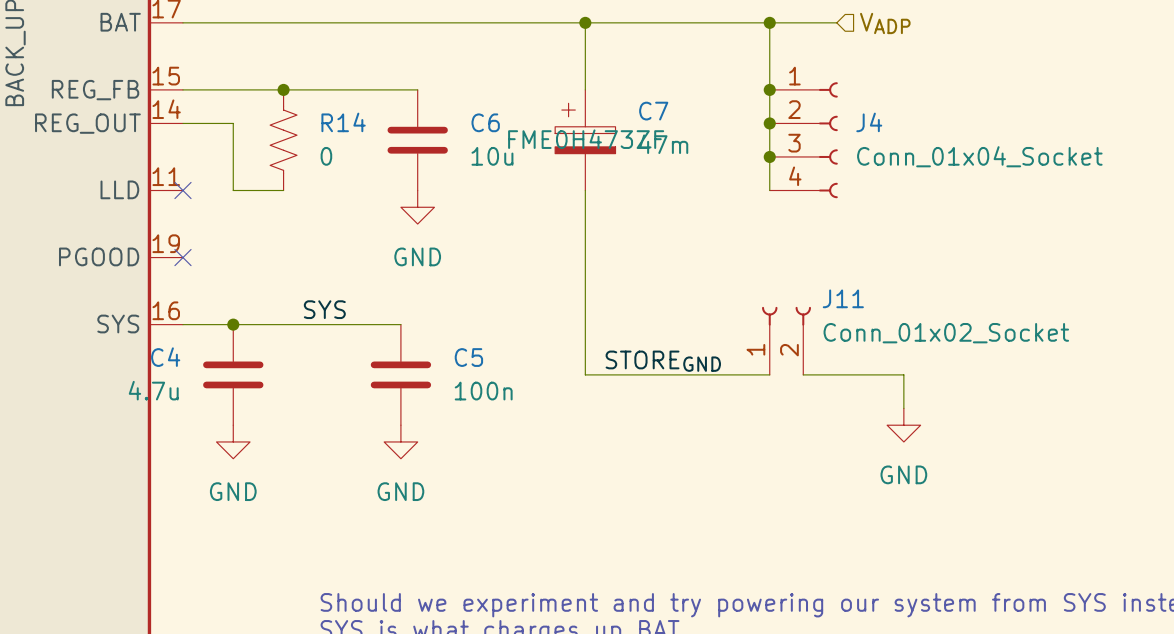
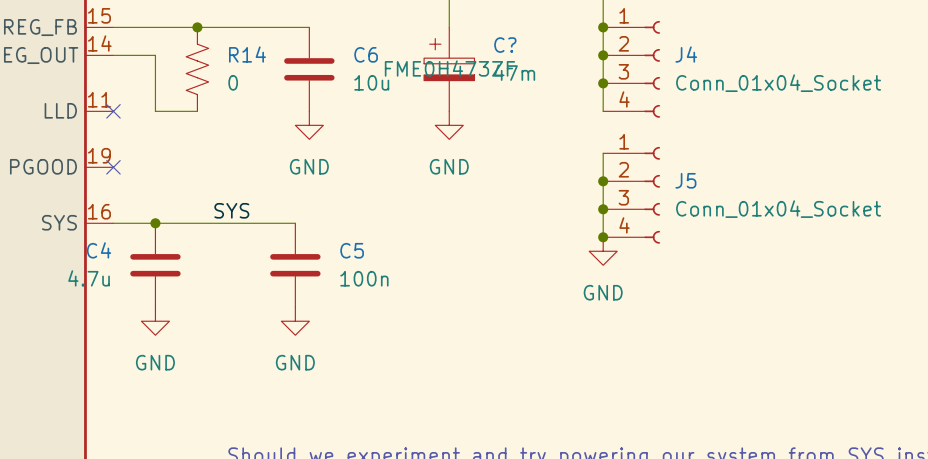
C7 name: C7 (653, 111) -> C? (505, 45)
wire: (585, 190) (585, 374) (769, 374) -> none
power symbol: none -> GND (449, 125)
wire: none -> (603, 153) (603, 237)
junction: none -> (603, 181)
J5: none -> Conn_01x04_Socket (631, 195)
junction: none -> (603, 209)
J11: Conn_01x02_Socket (786, 340) -> none
junction: none -> (603, 237)
label: STOREGND (663, 361) -> none
wire: (803, 374) (903, 374) (903, 408) -> none
power symbol position: GND (903, 425) -> GND (603, 251)

